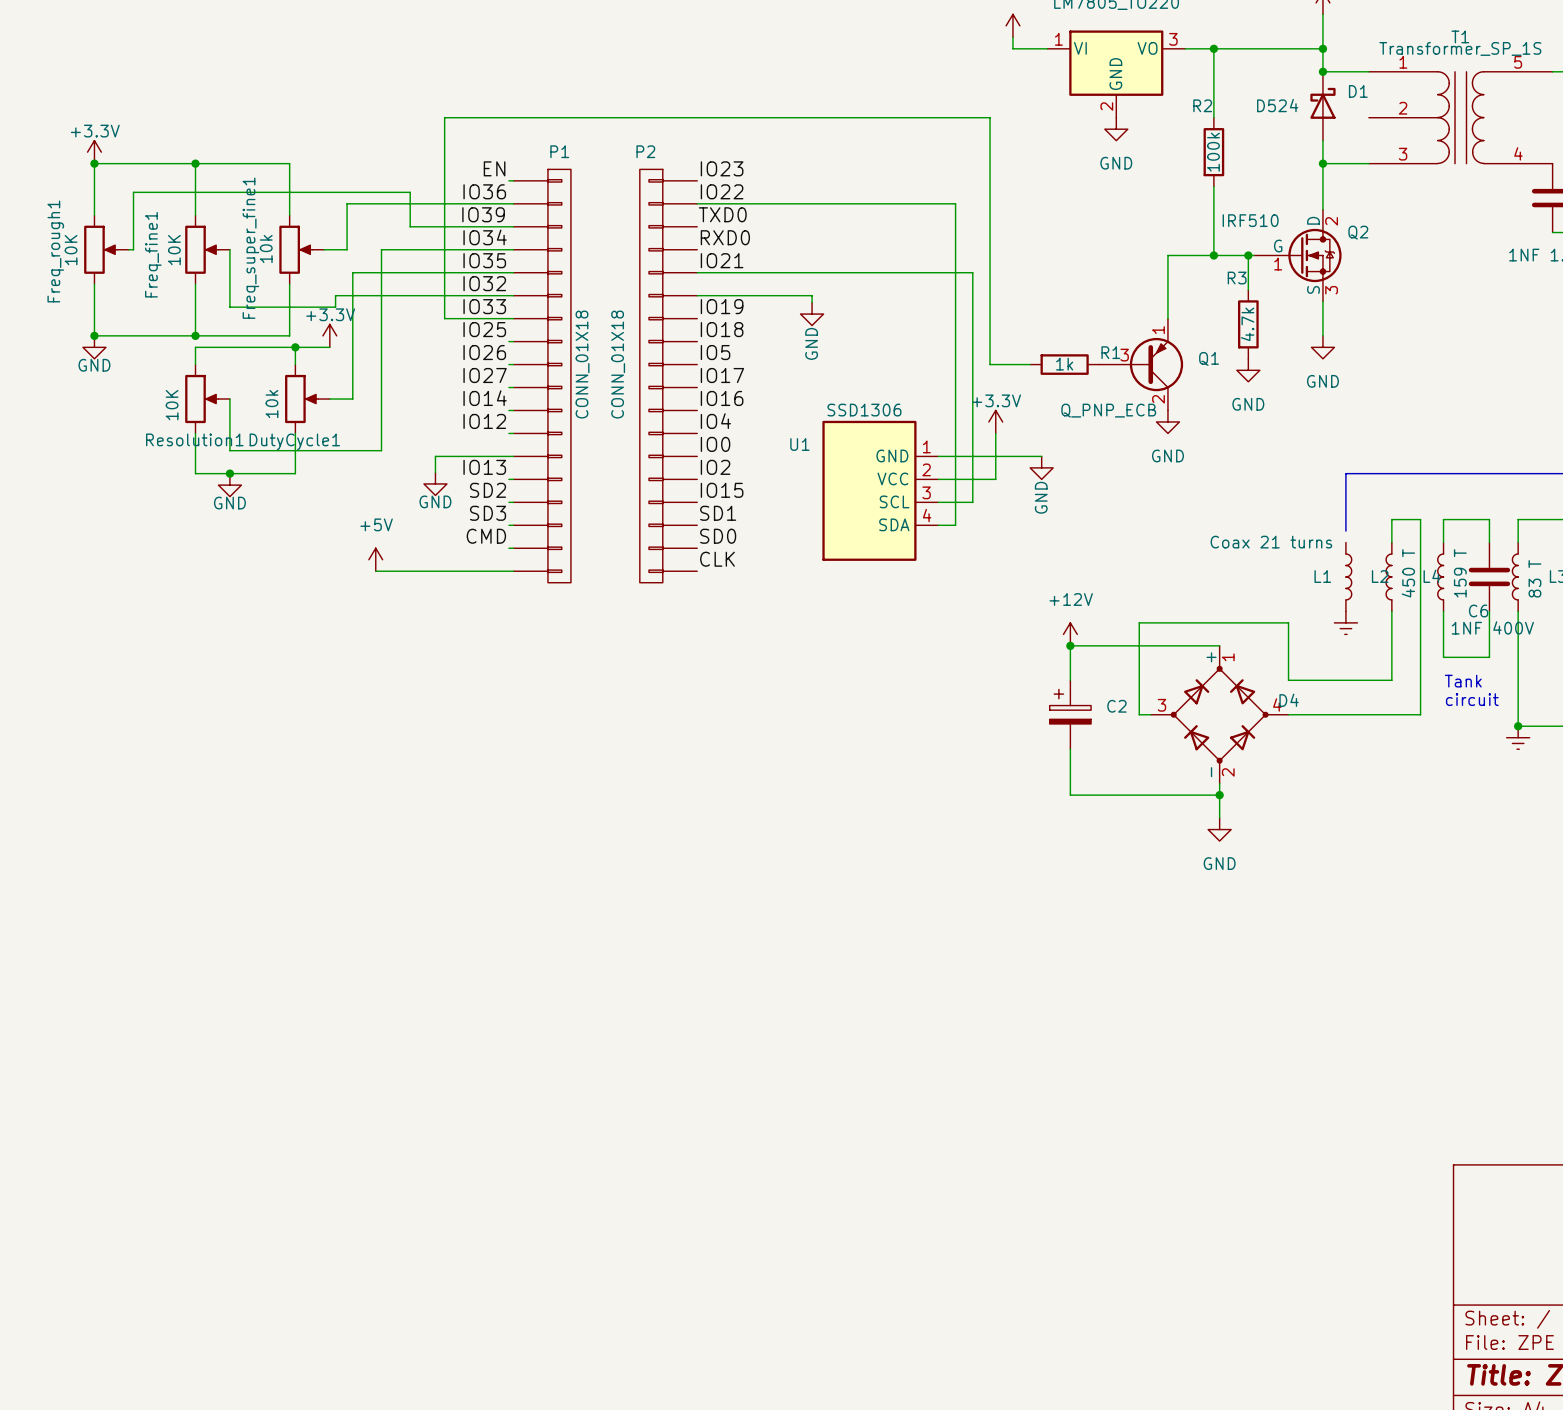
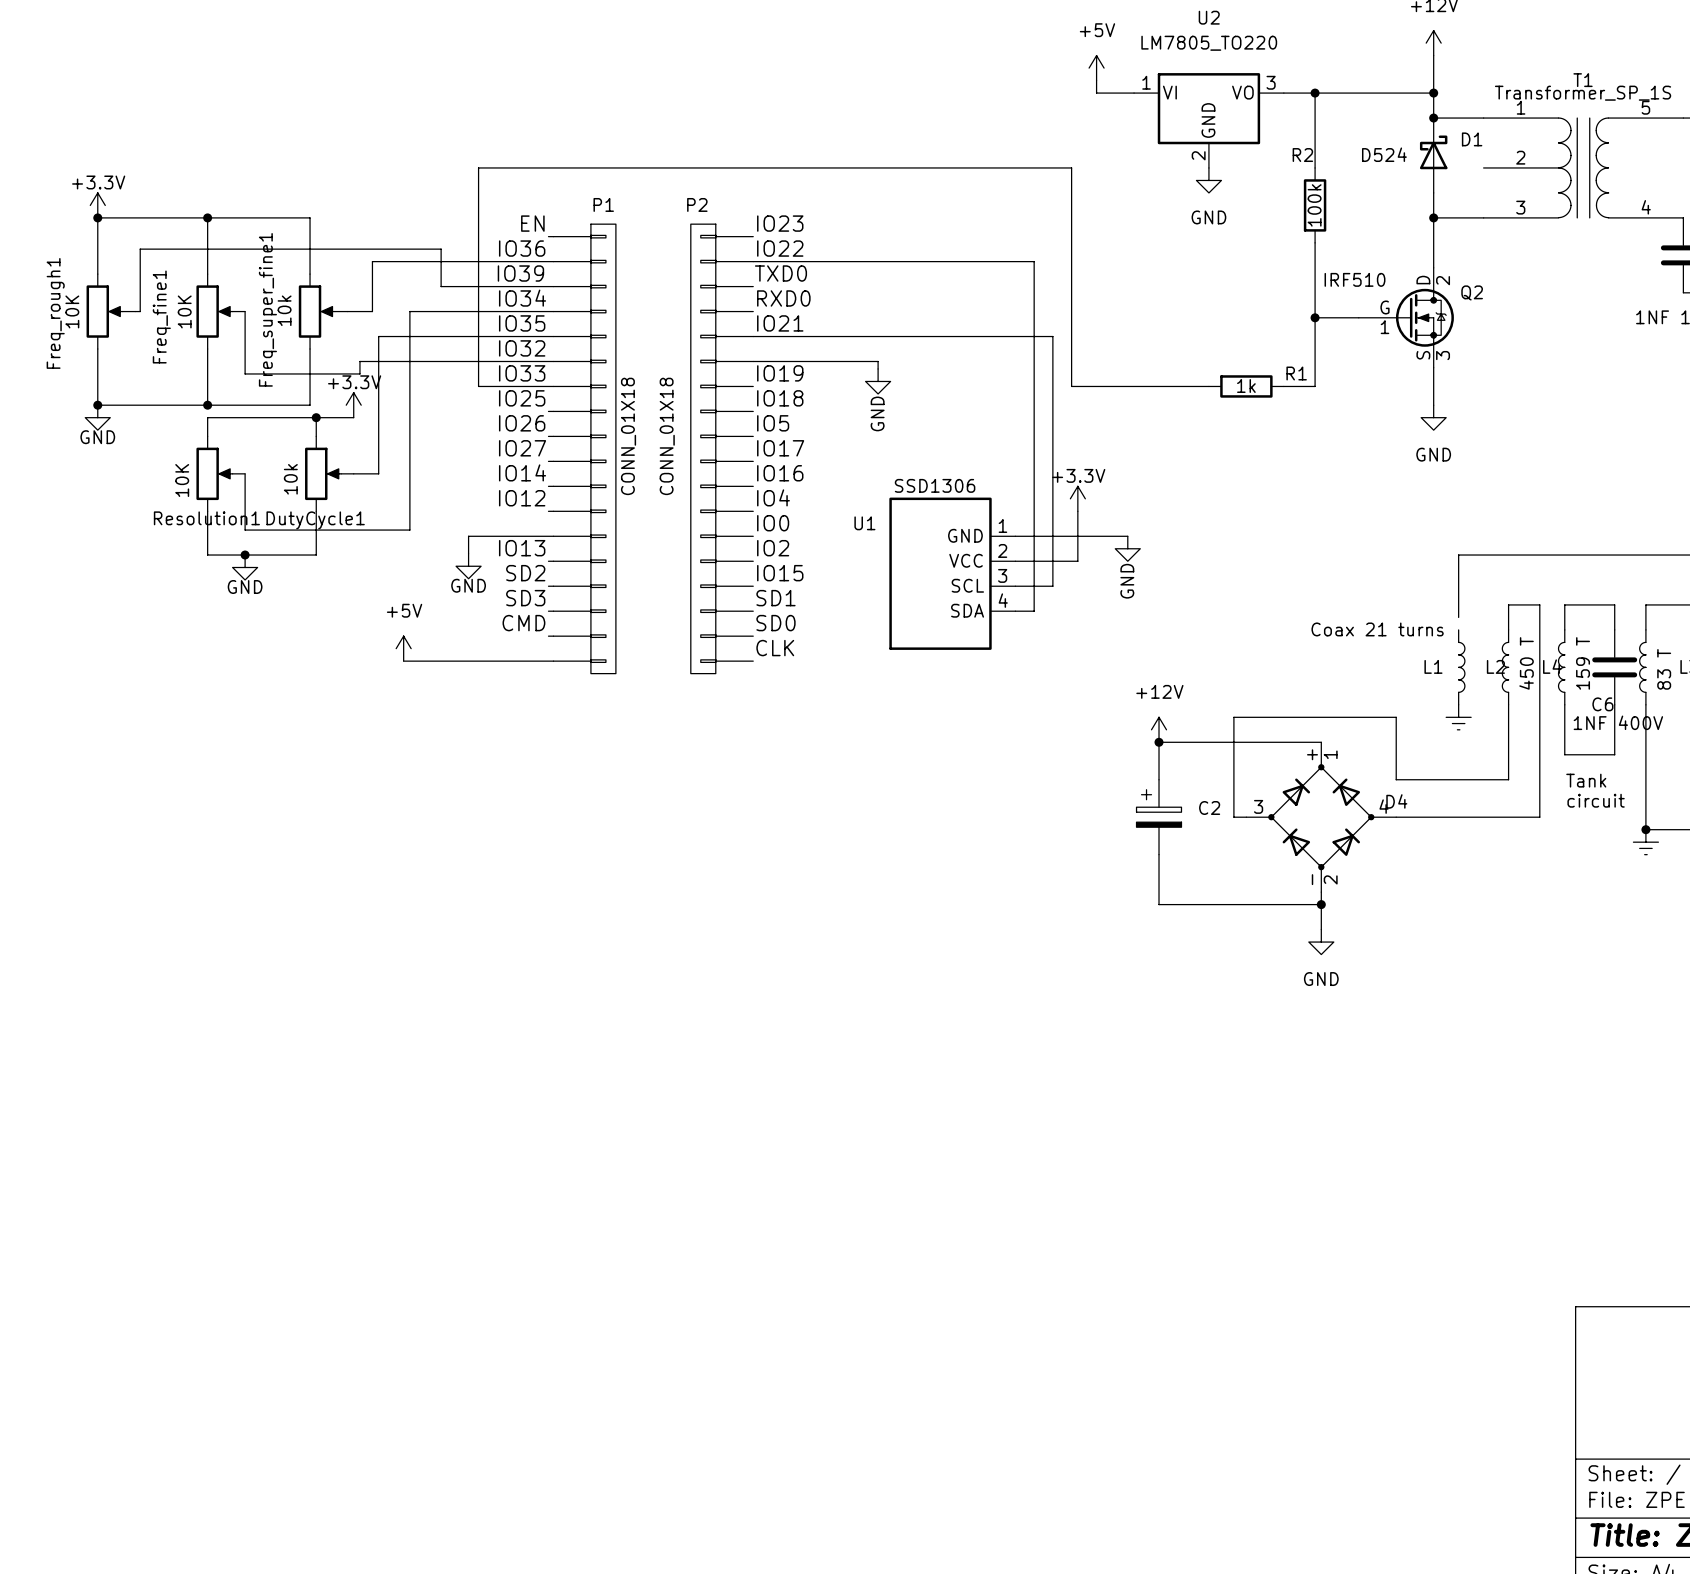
wire: (1213, 255) (1167, 255) (1167, 318) -> (1315, 317) (1315, 386) (1283, 386)
wire: (1248, 255) (1248, 289) -> none
junction: (1248, 255) -> none
wire: (990, 318) (990, 364) (1030, 364) -> (1071, 386) (1208, 386)
R3: 4.7k (1248, 324) -> none
R1 position: (1064, 364) -> (1246, 386)
Q1: Q_PNP_ECB (1141, 364) -> none
power symbol: GND (1248, 370) -> none
power symbol: GND (1167, 421) -> none

